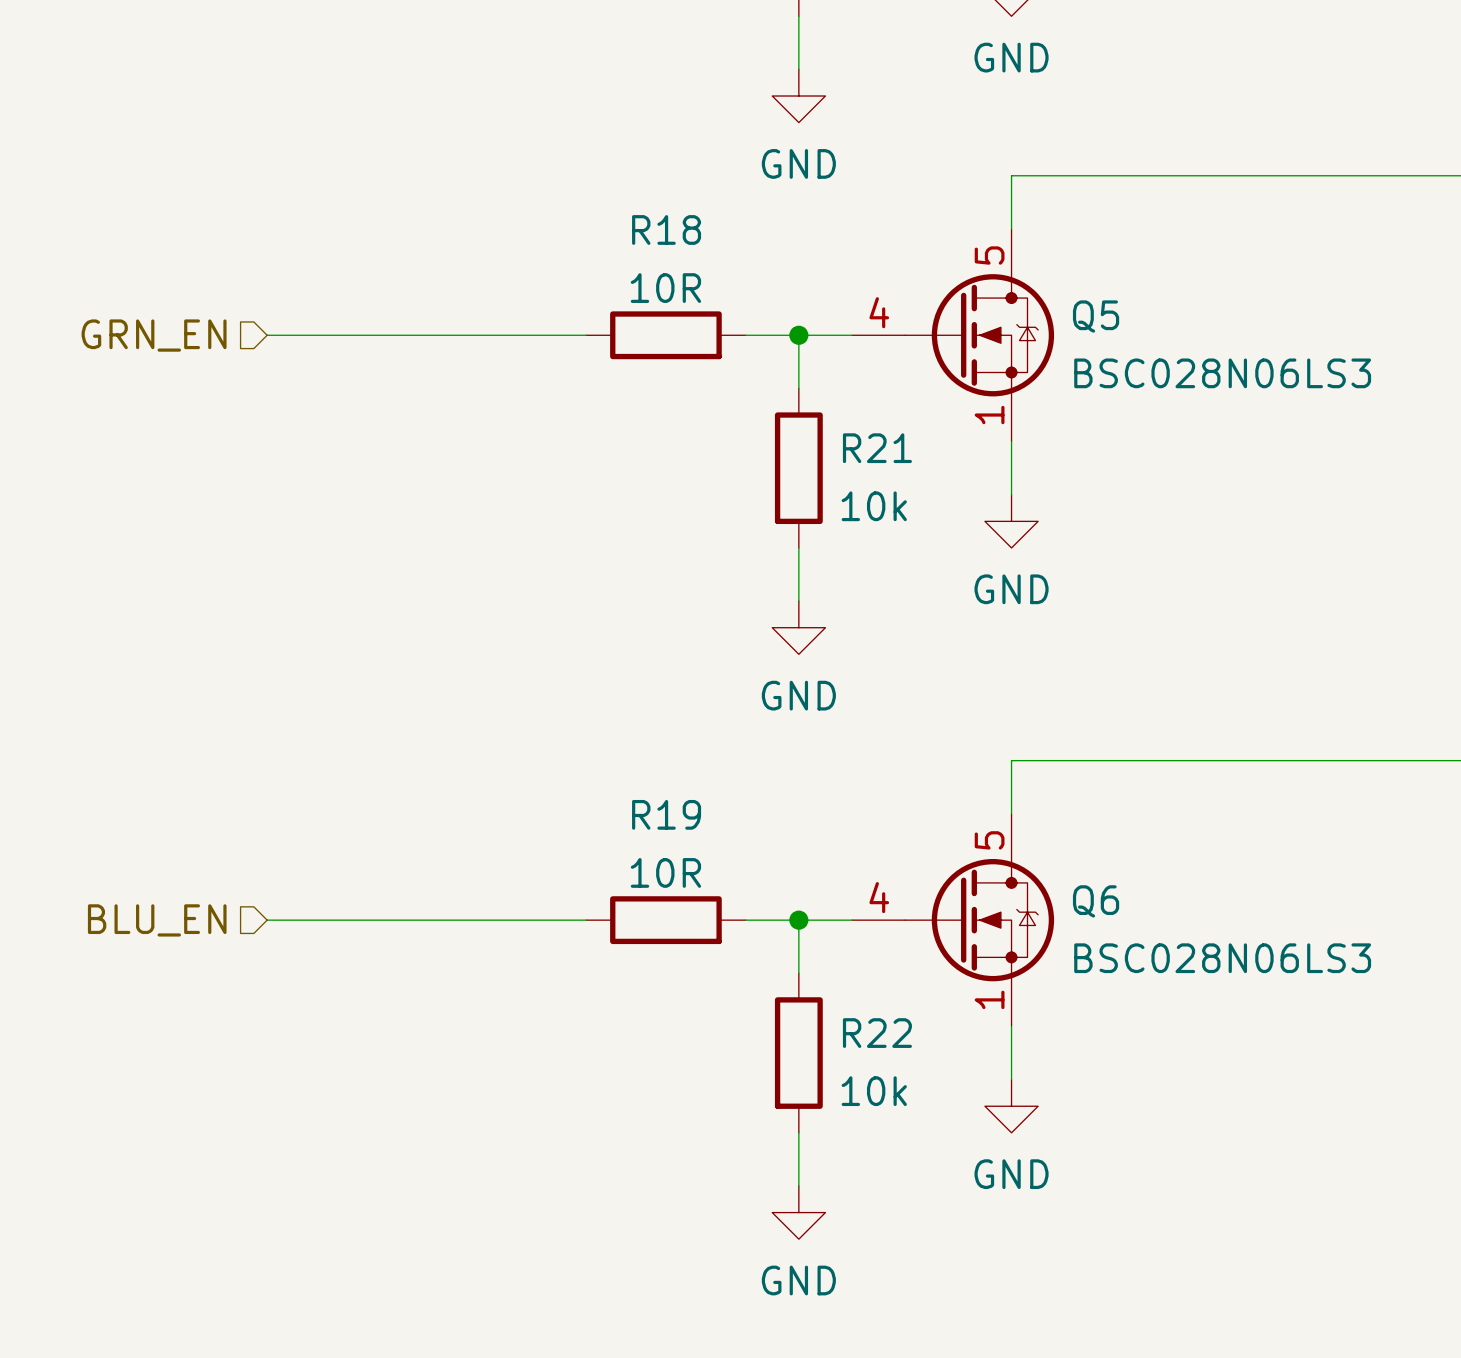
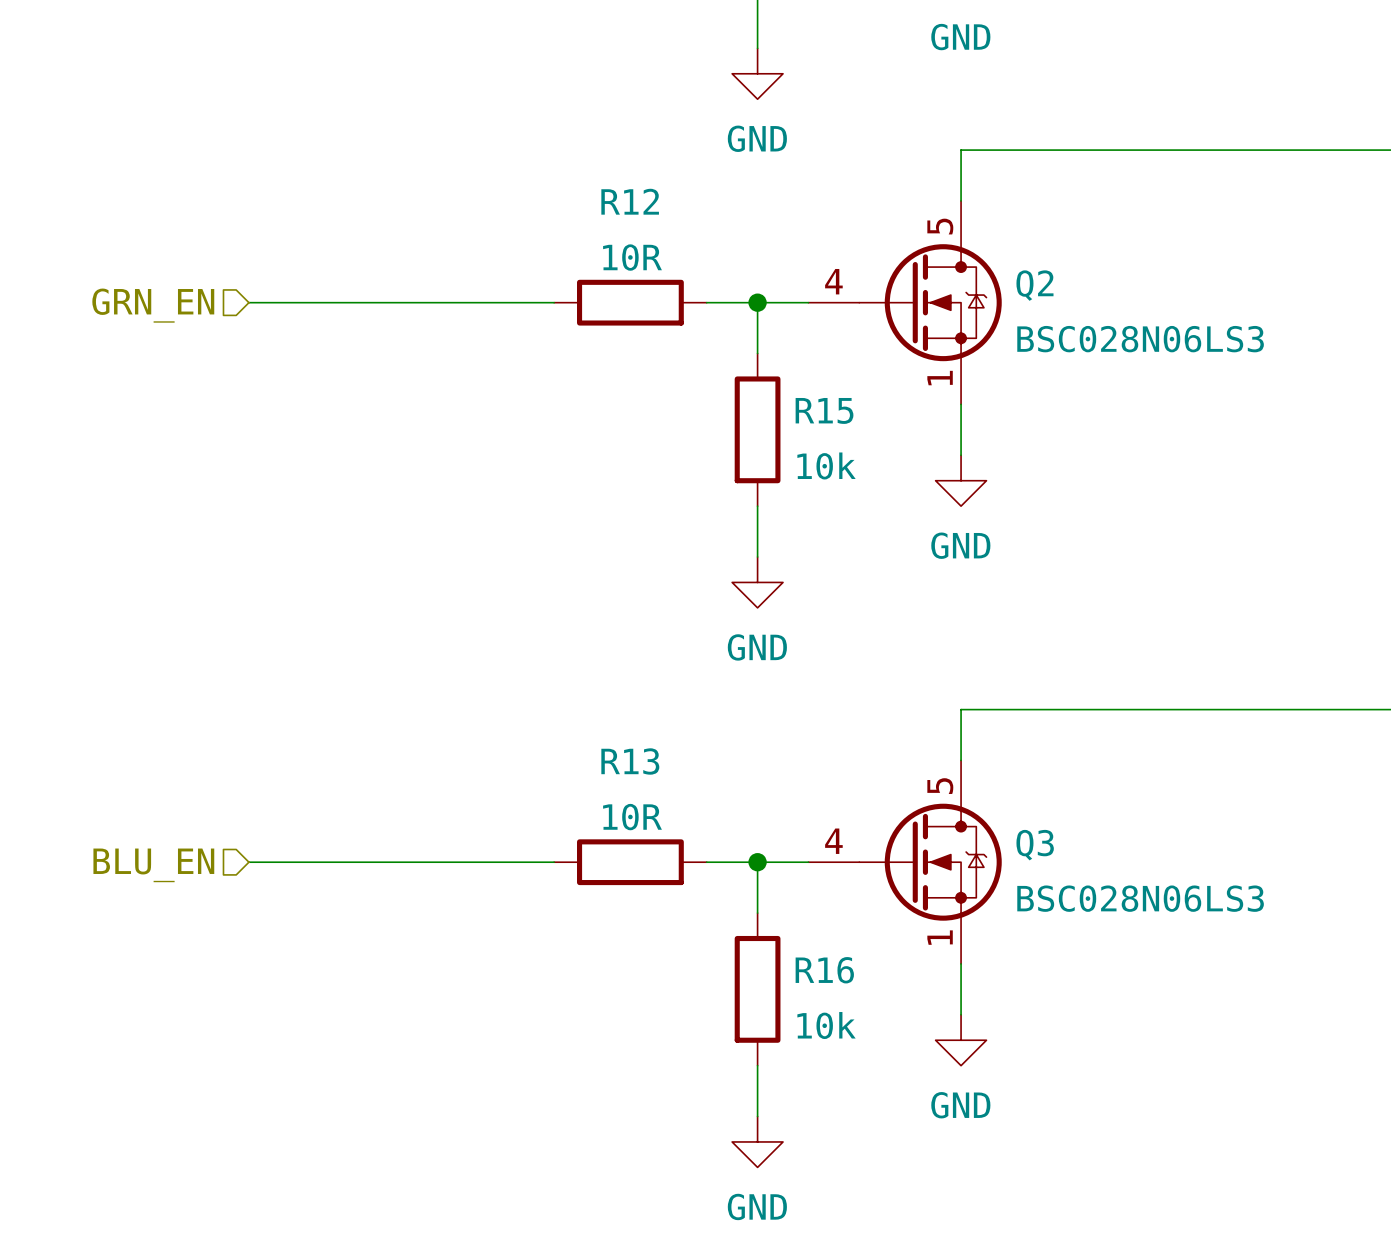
R18 name: R18 (666, 229) -> R12 (630, 201)
Q5 name: Q5 (1096, 316) -> Q2 (1034, 285)
R21 name: R21 (877, 448) -> R15 (824, 410)
R19 name: R19 (666, 814) -> R13 (630, 761)
Q6 name: Q6 (1096, 901) -> Q3 (1035, 845)
R22 name: R22 (877, 1033) -> R16 (824, 970)

